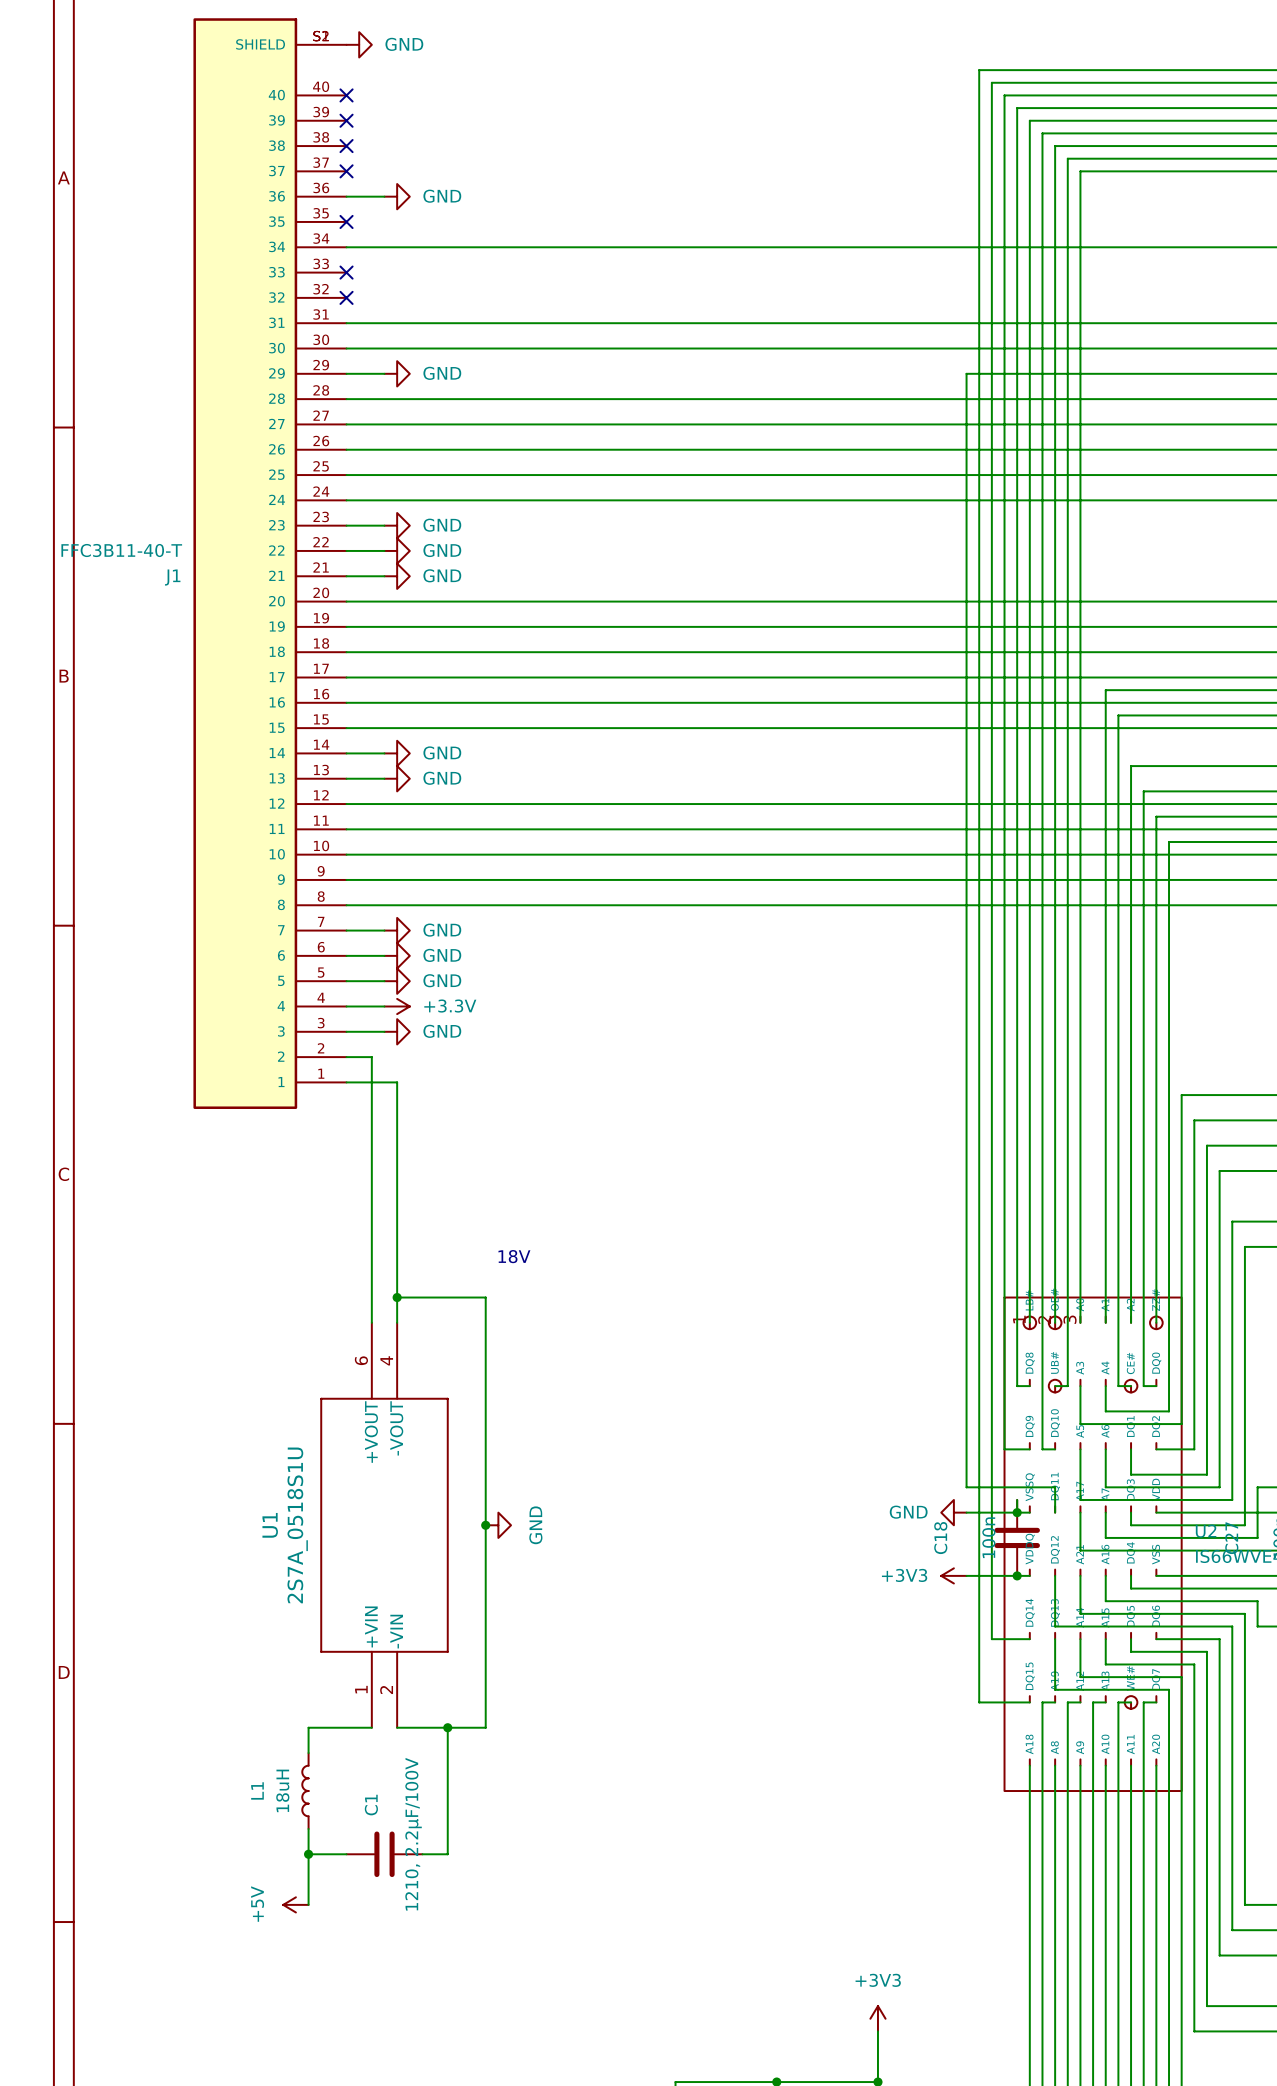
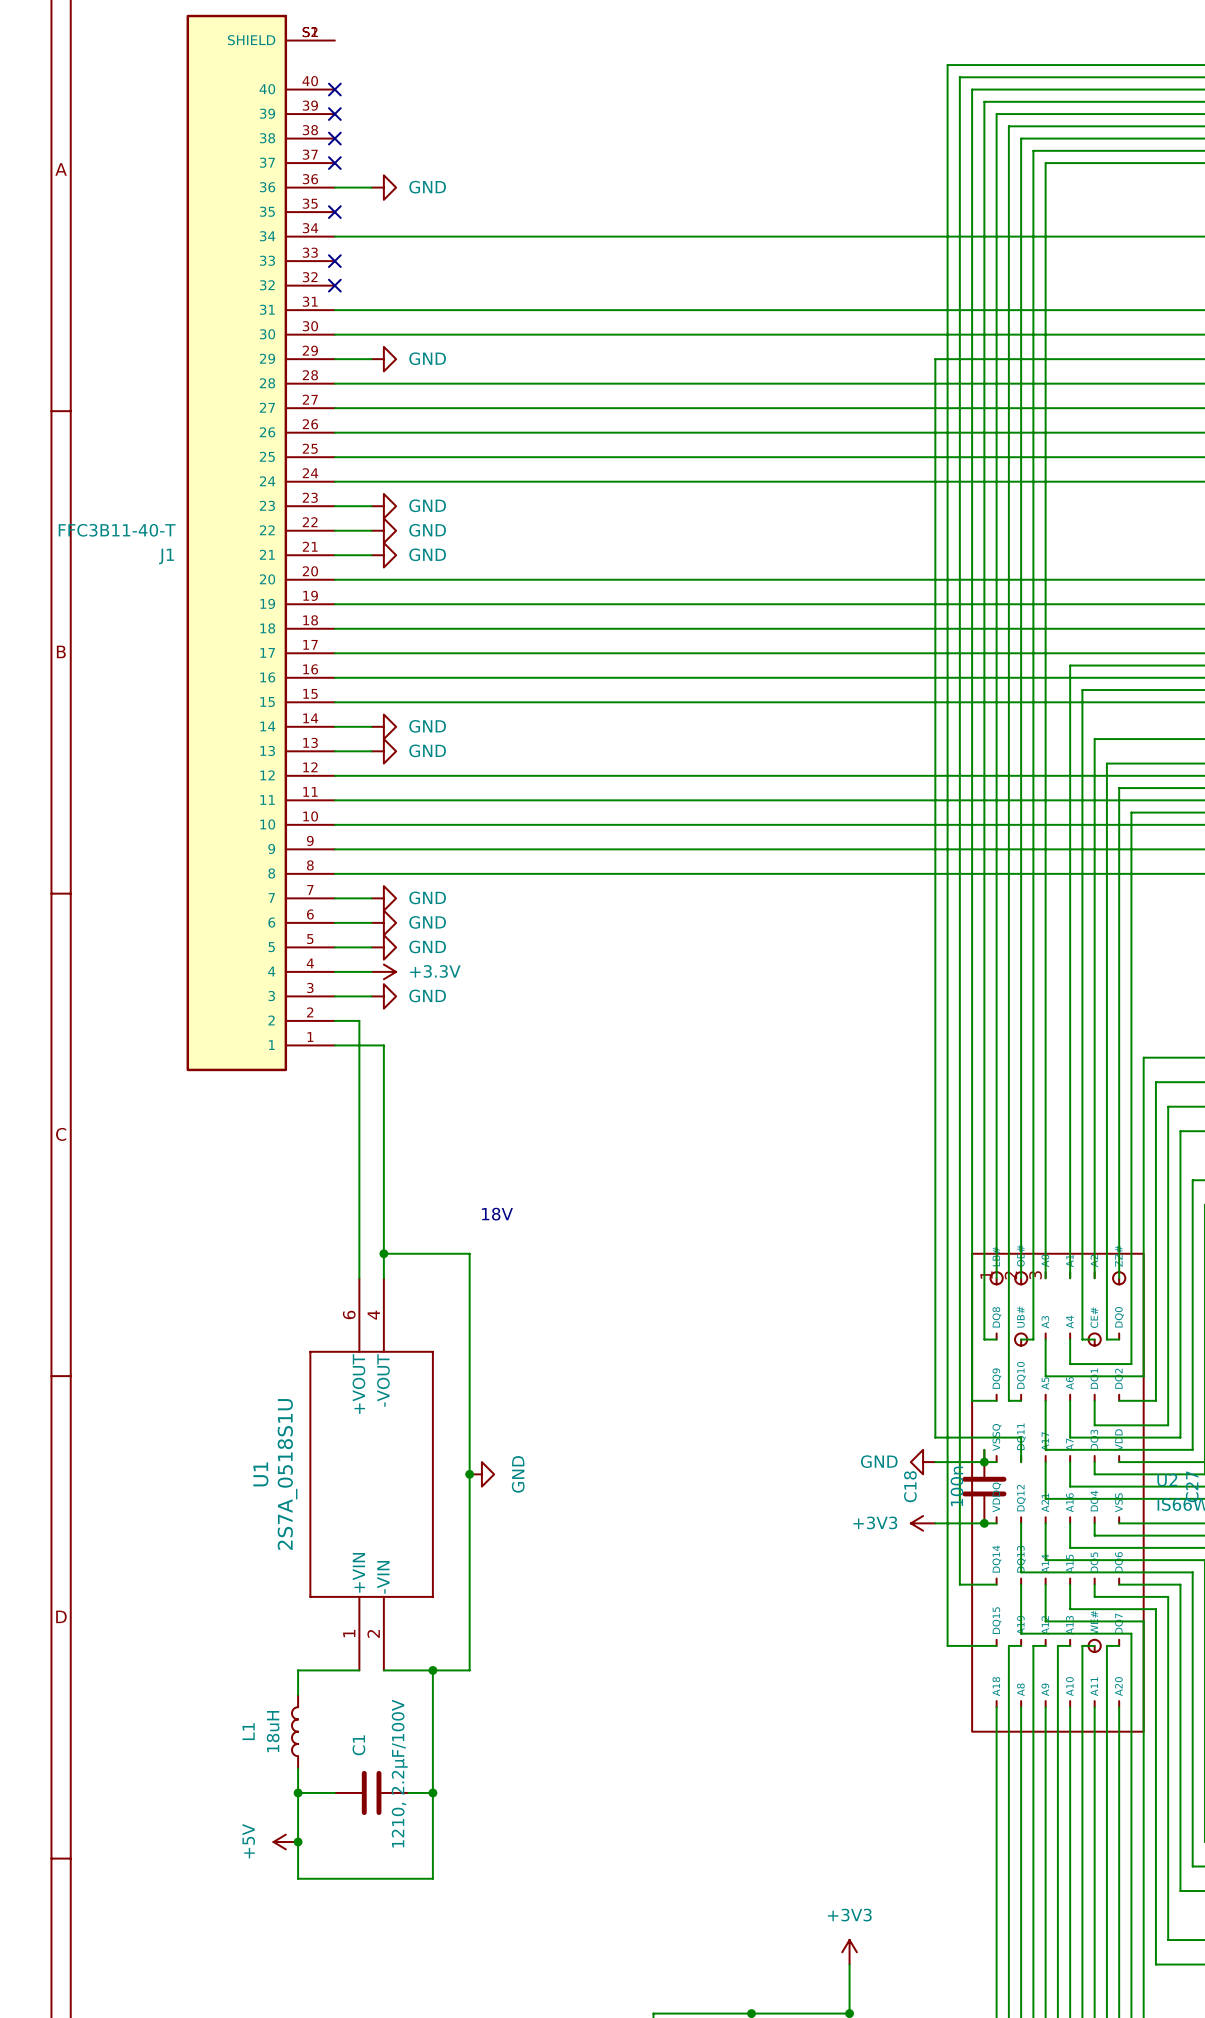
power symbol: GND (359, 44) -> none
wire: none -> (432, 1792) (432, 1878) (298, 1878) (298, 1841)
junction: none -> (432, 1792)
junction: none -> (298, 1841)

